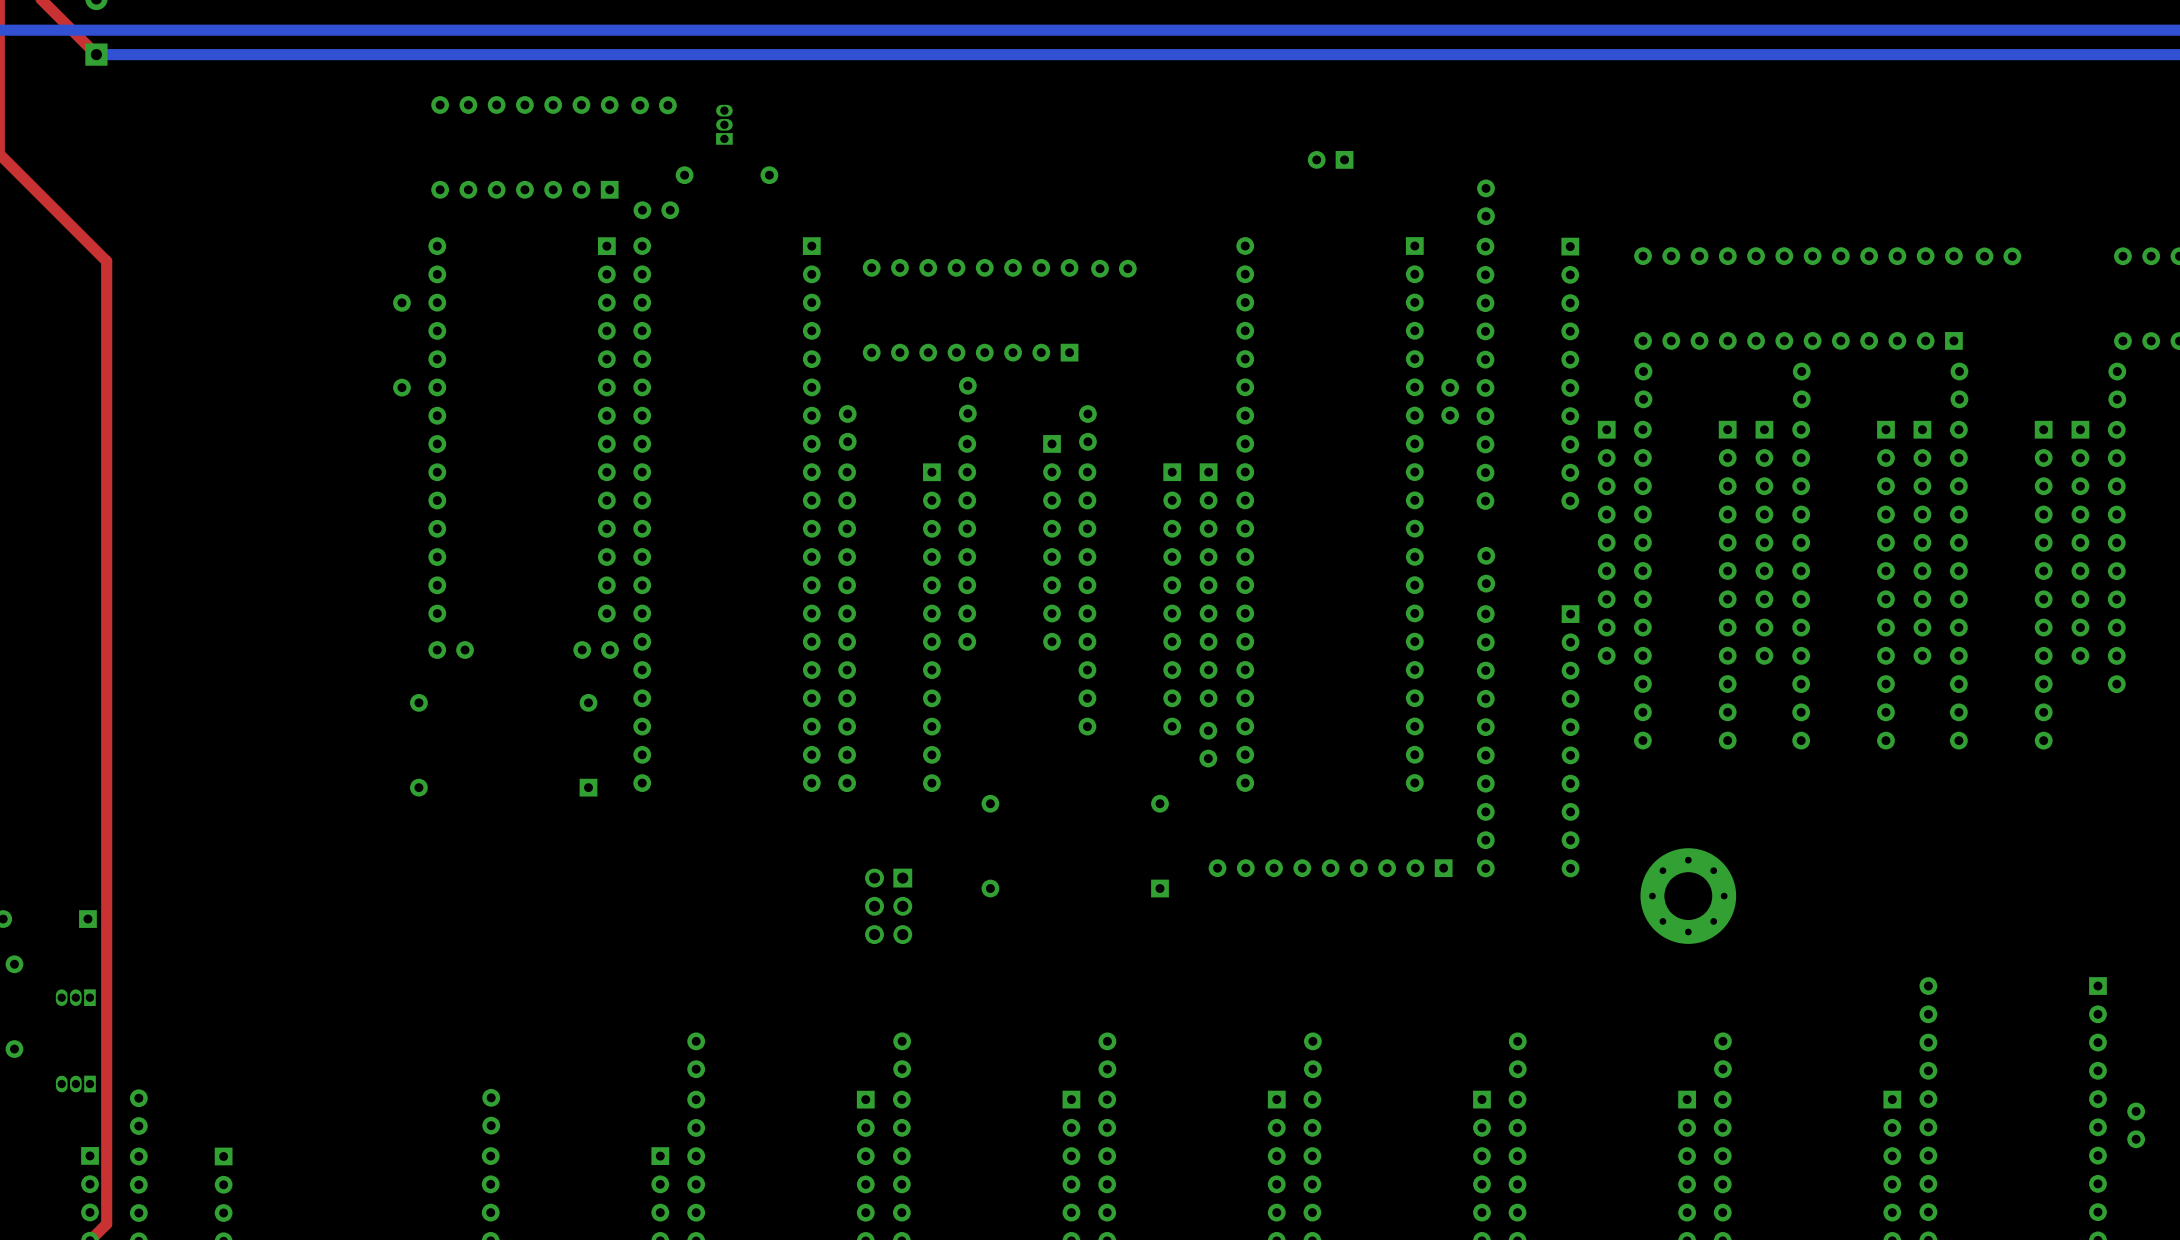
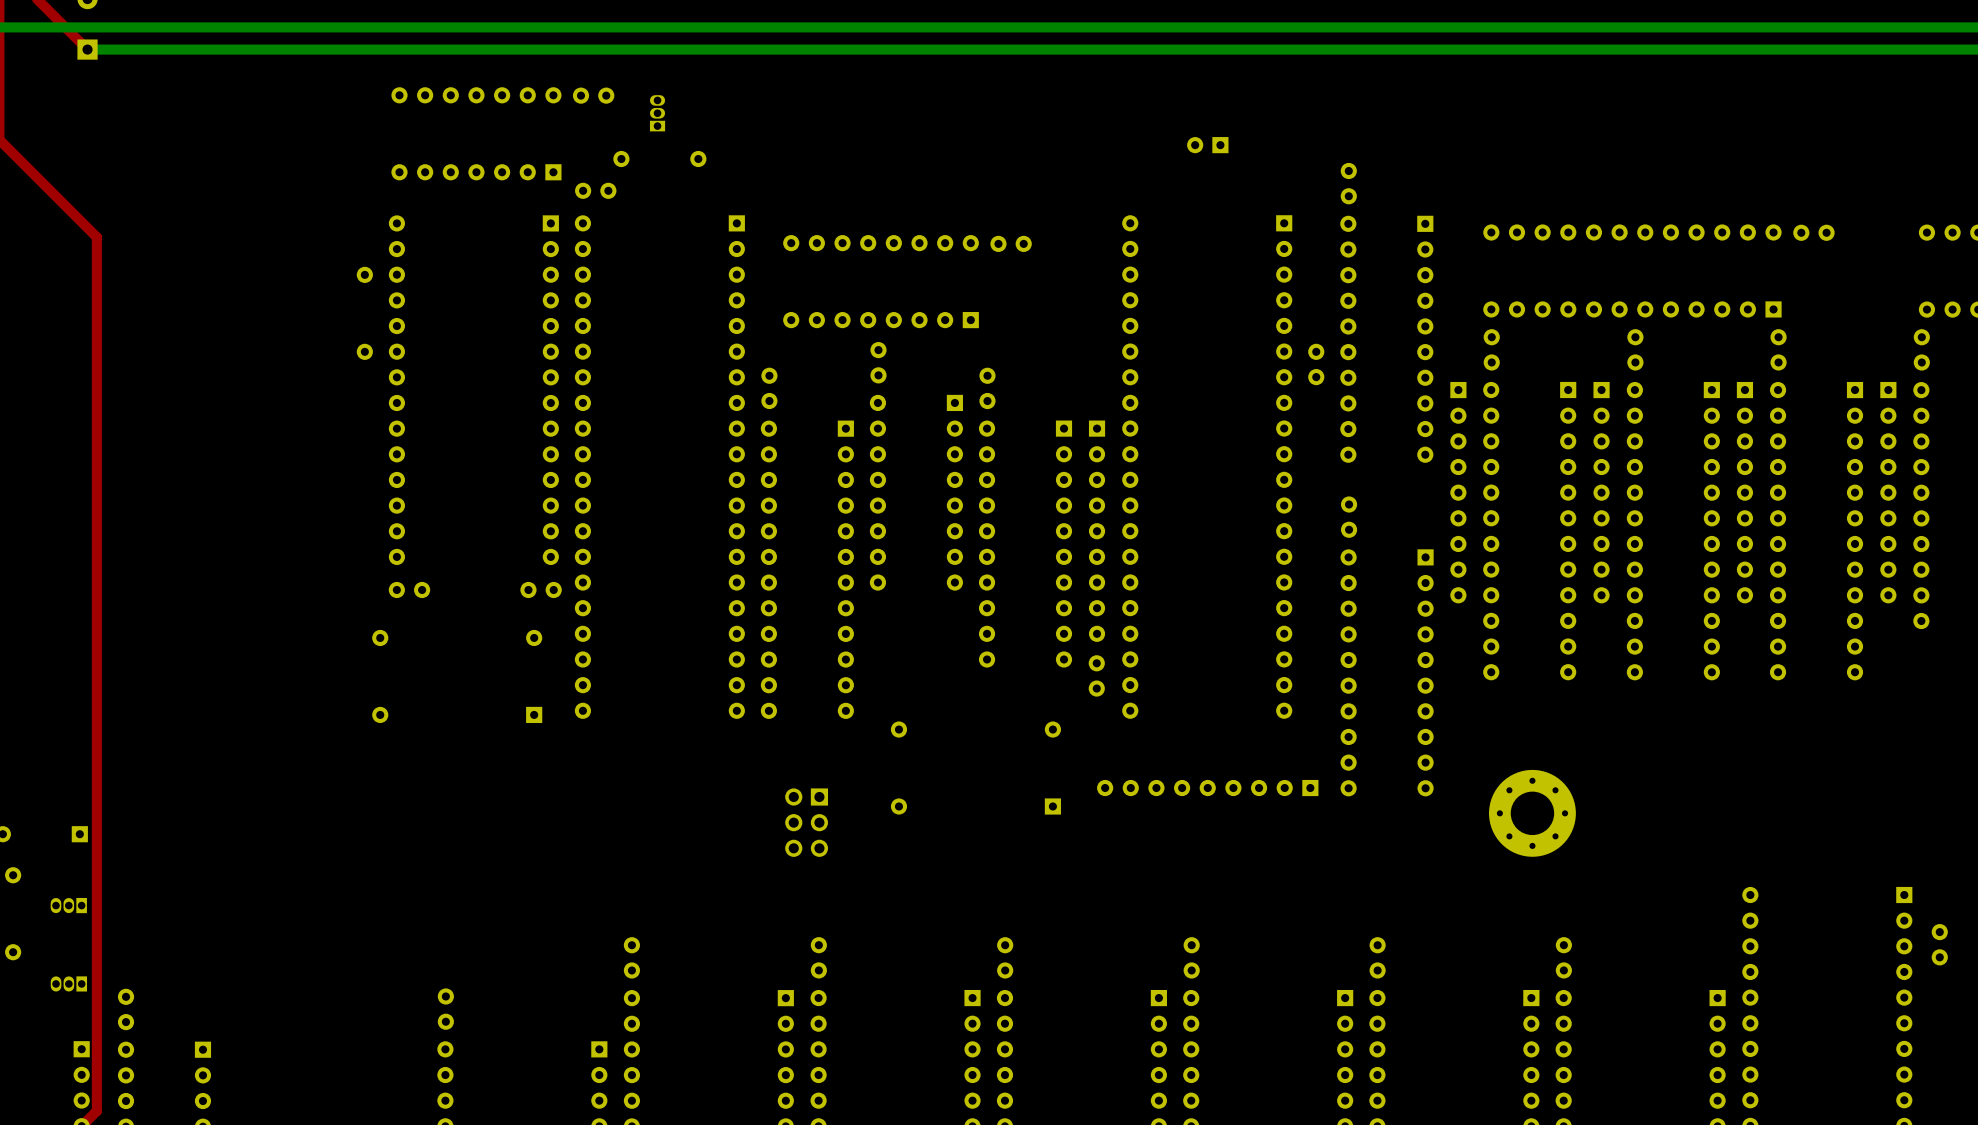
part position: (2136, 1125) -> (1939, 944)

